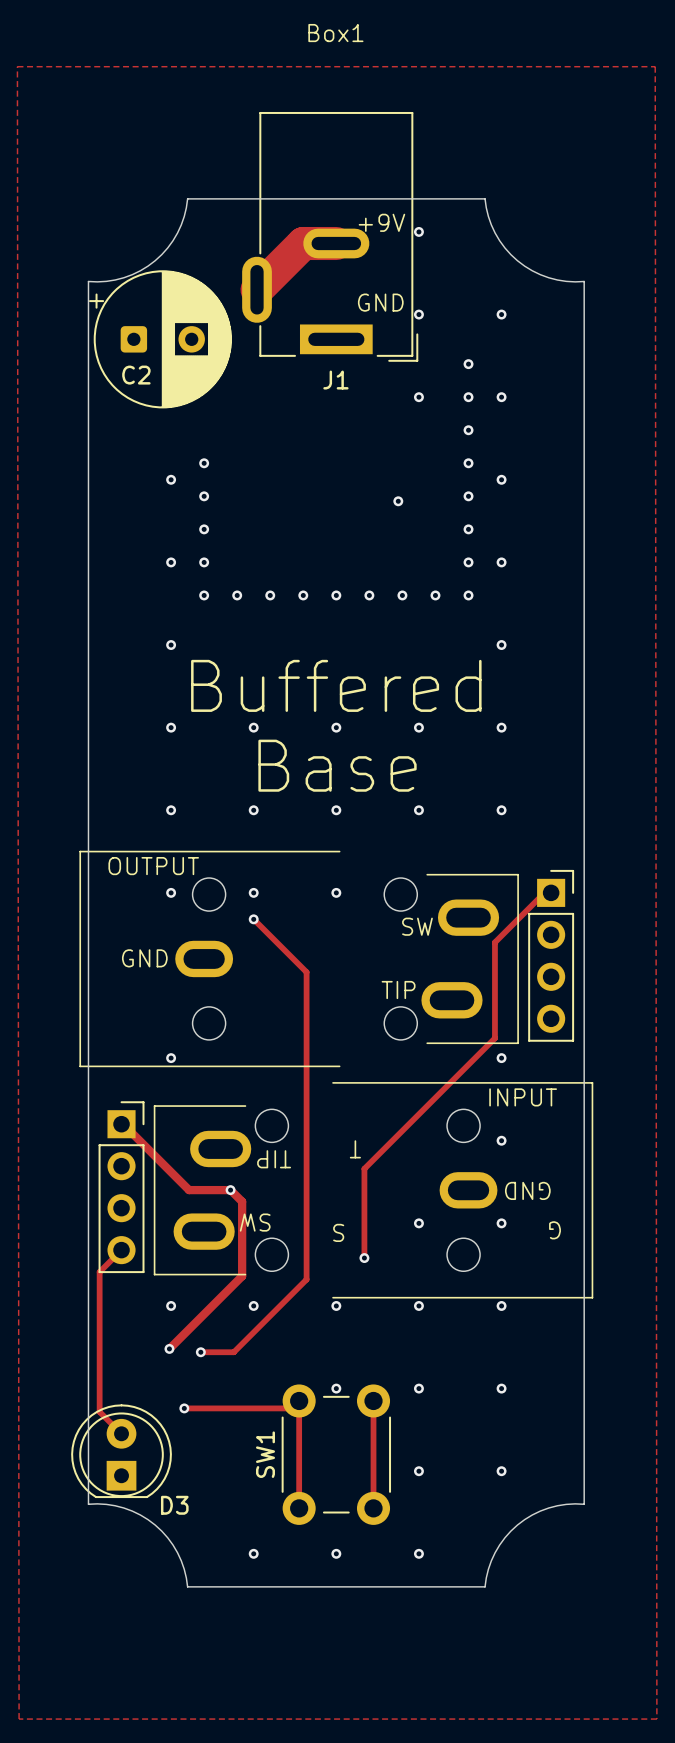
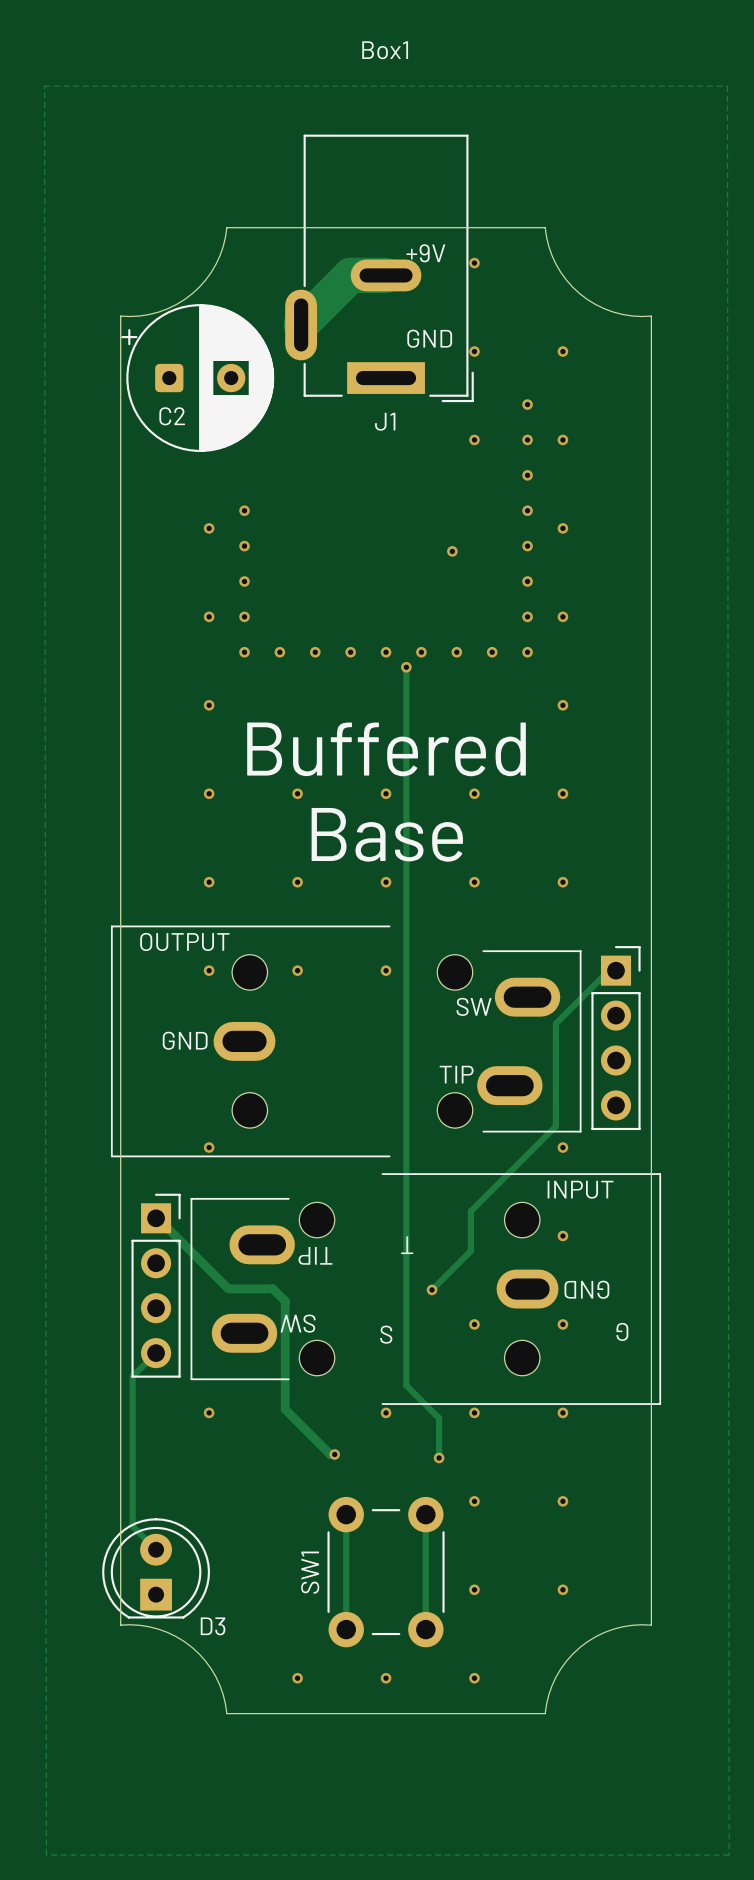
track: none -> (406, 667) (406, 1385) (439, 1418) (439, 1458)
via: none -> (406, 667)
track: (253, 919) (306, 972) (306, 1279) (233, 1352) (200, 1352) -> none
via: (253, 919) -> none
track: (415, 1117) (364, 1168) (364, 1258) -> (470, 1211) (470, 1251) (432, 1289)
via: (230, 1190) -> none
via: none -> (432, 1289)
via: (364, 1258) -> none
track: (242, 1276) (169, 1348) -> (285, 1381) (285, 1409) (330, 1454) (334, 1454)
via: (253, 1305) -> none
via: none -> (334, 1454)
via: (169, 1348) -> none
via: none -> (439, 1458)
via: (200, 1352) -> none
via: (336, 1388) -> none
track: (299, 1400) (291, 1408) (184, 1408) -> none
via: (184, 1408) -> none

